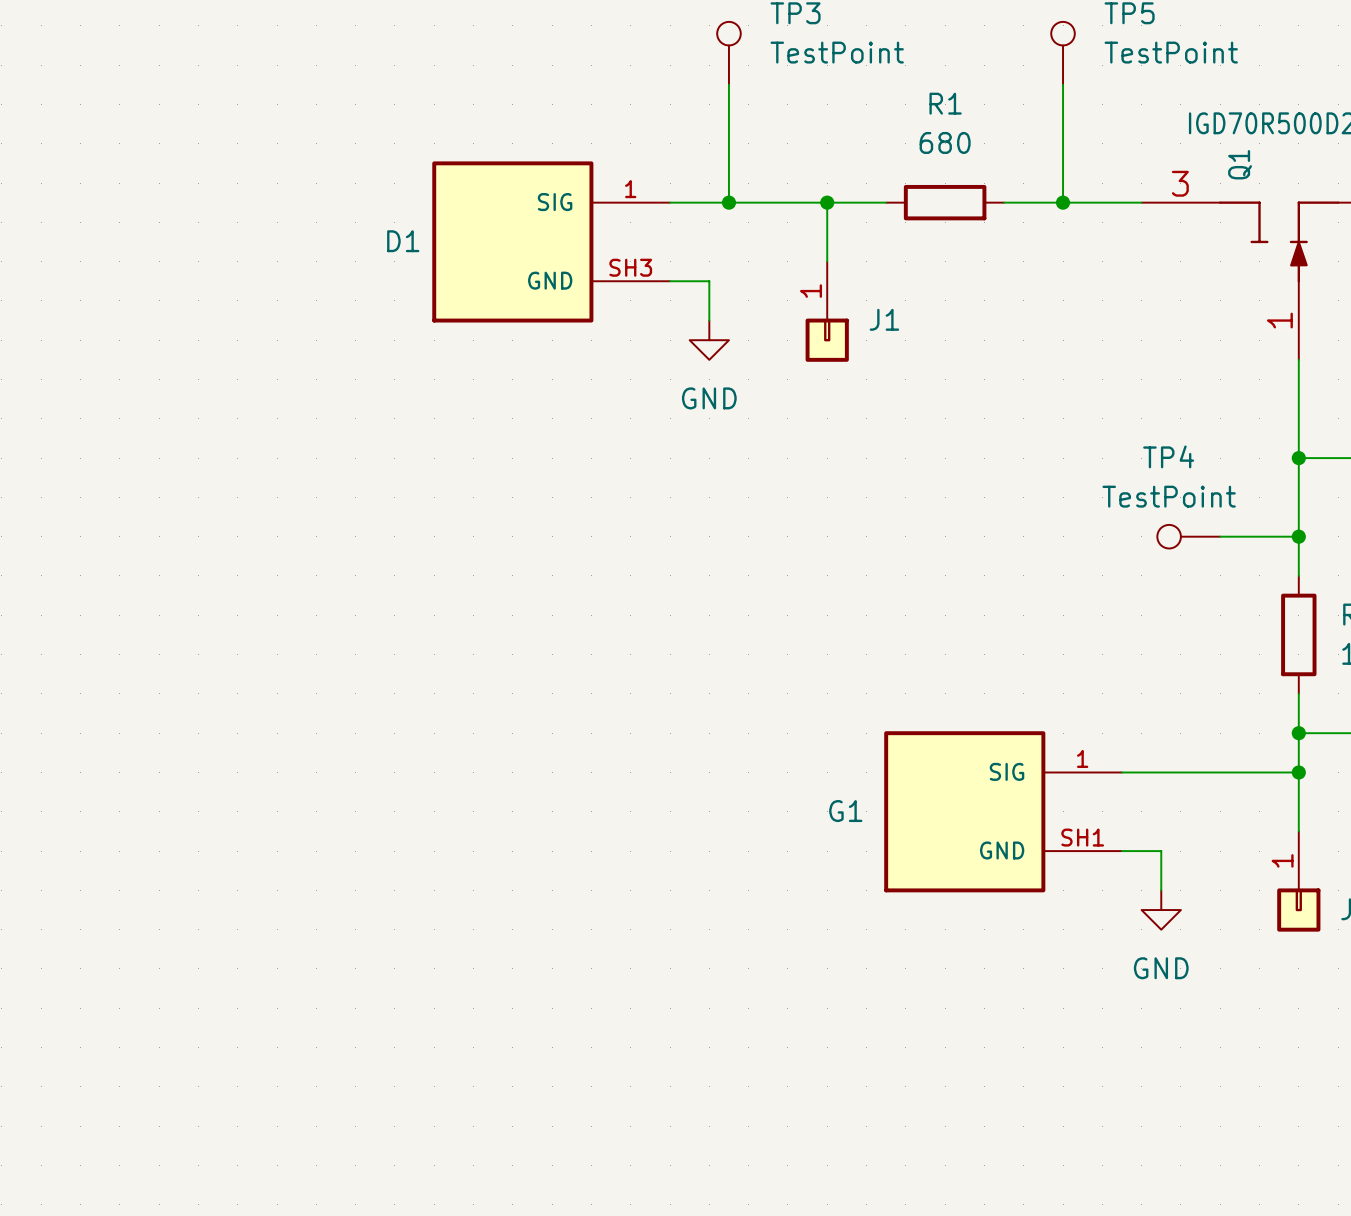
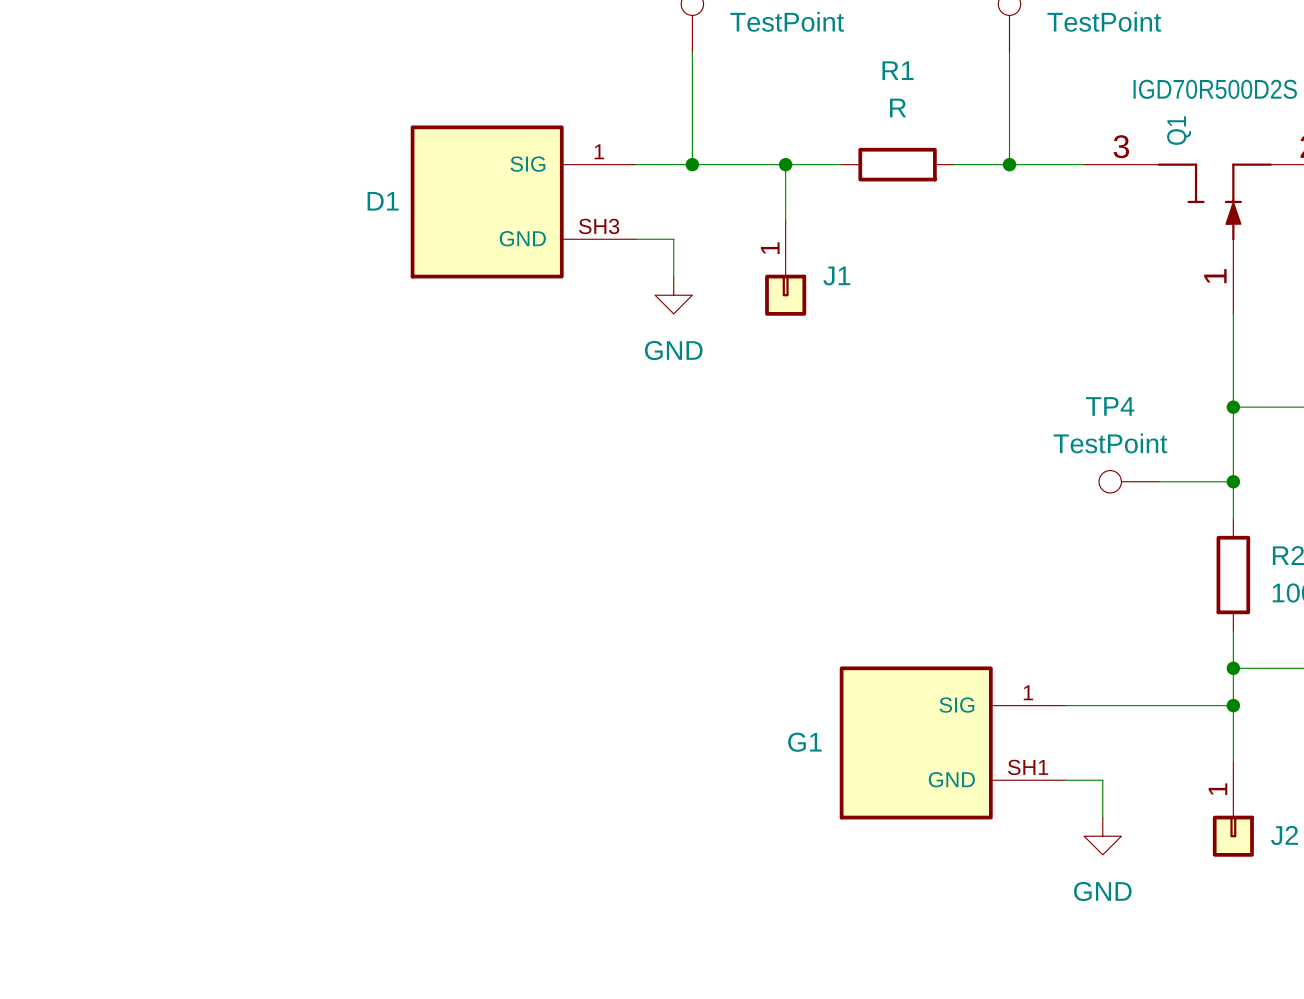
R1 value: 680 (945, 142) -> R (898, 107)

